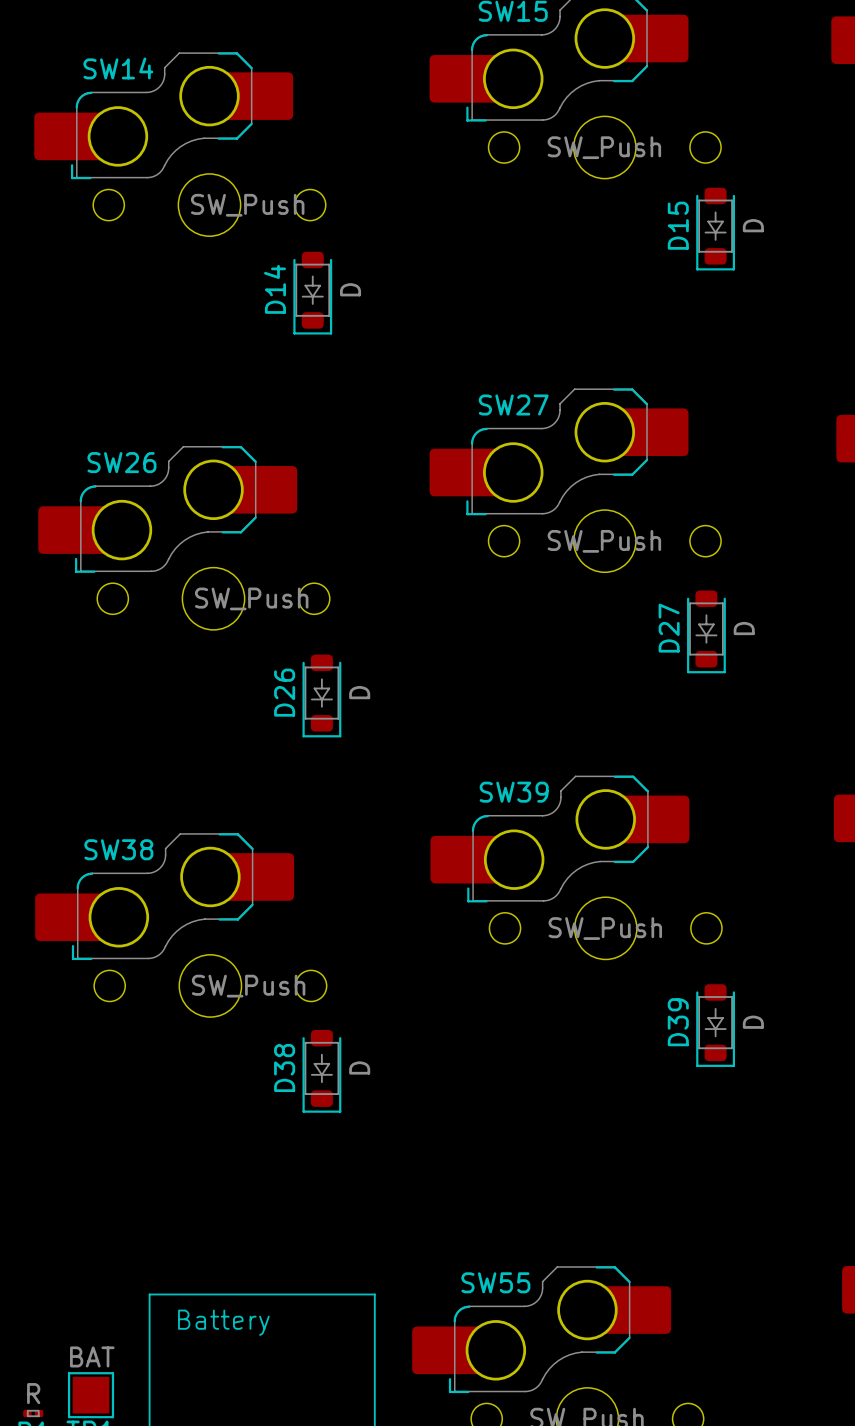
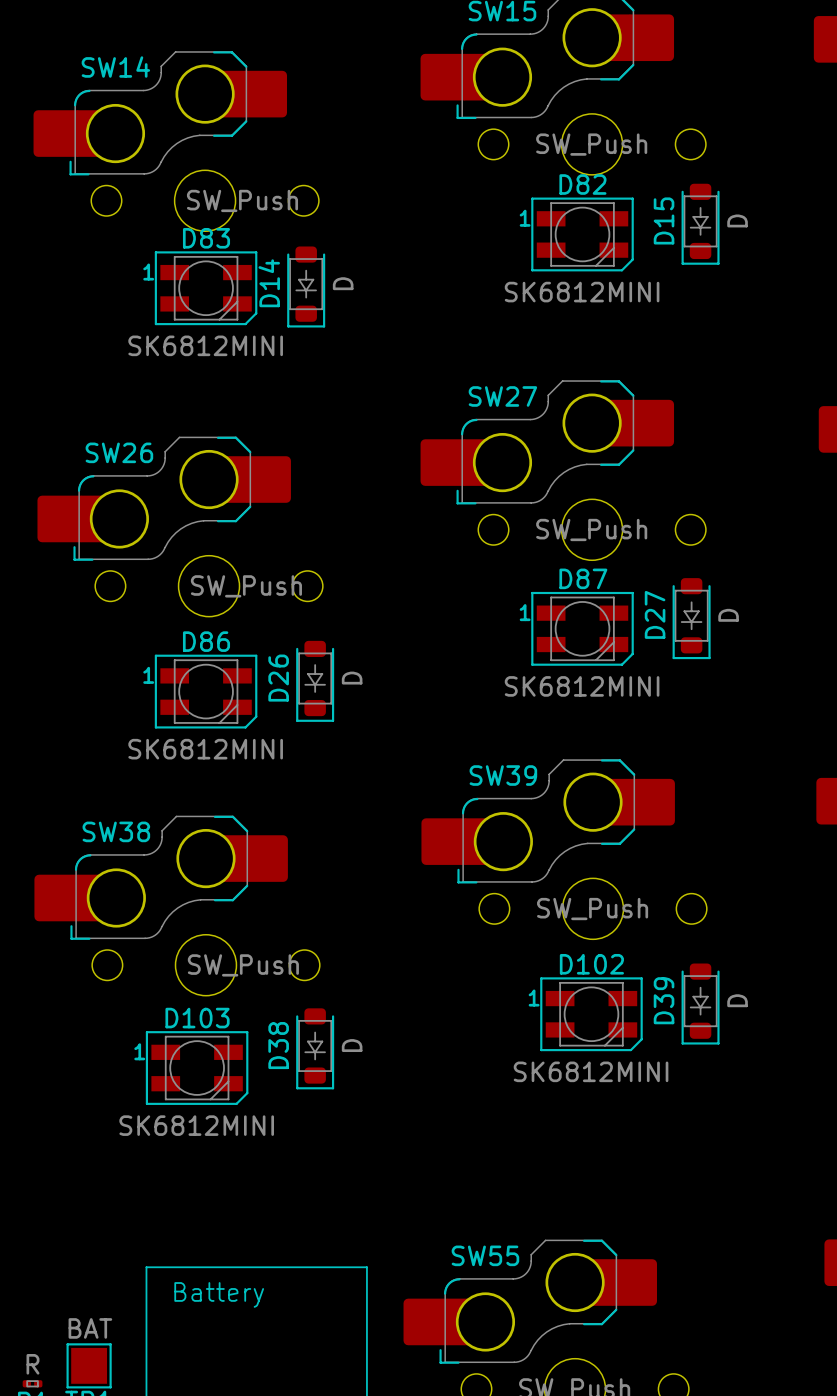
D82: none -> SK6812MINI (582, 234)
D83: none -> SK6812MINI (206, 288)
D87: none -> SK6812MINI (582, 628)
D86: none -> SK6812MINI (206, 691)
D102: none -> SK6812MINI (591, 1014)
D103: none -> SK6812MINI (197, 1068)

